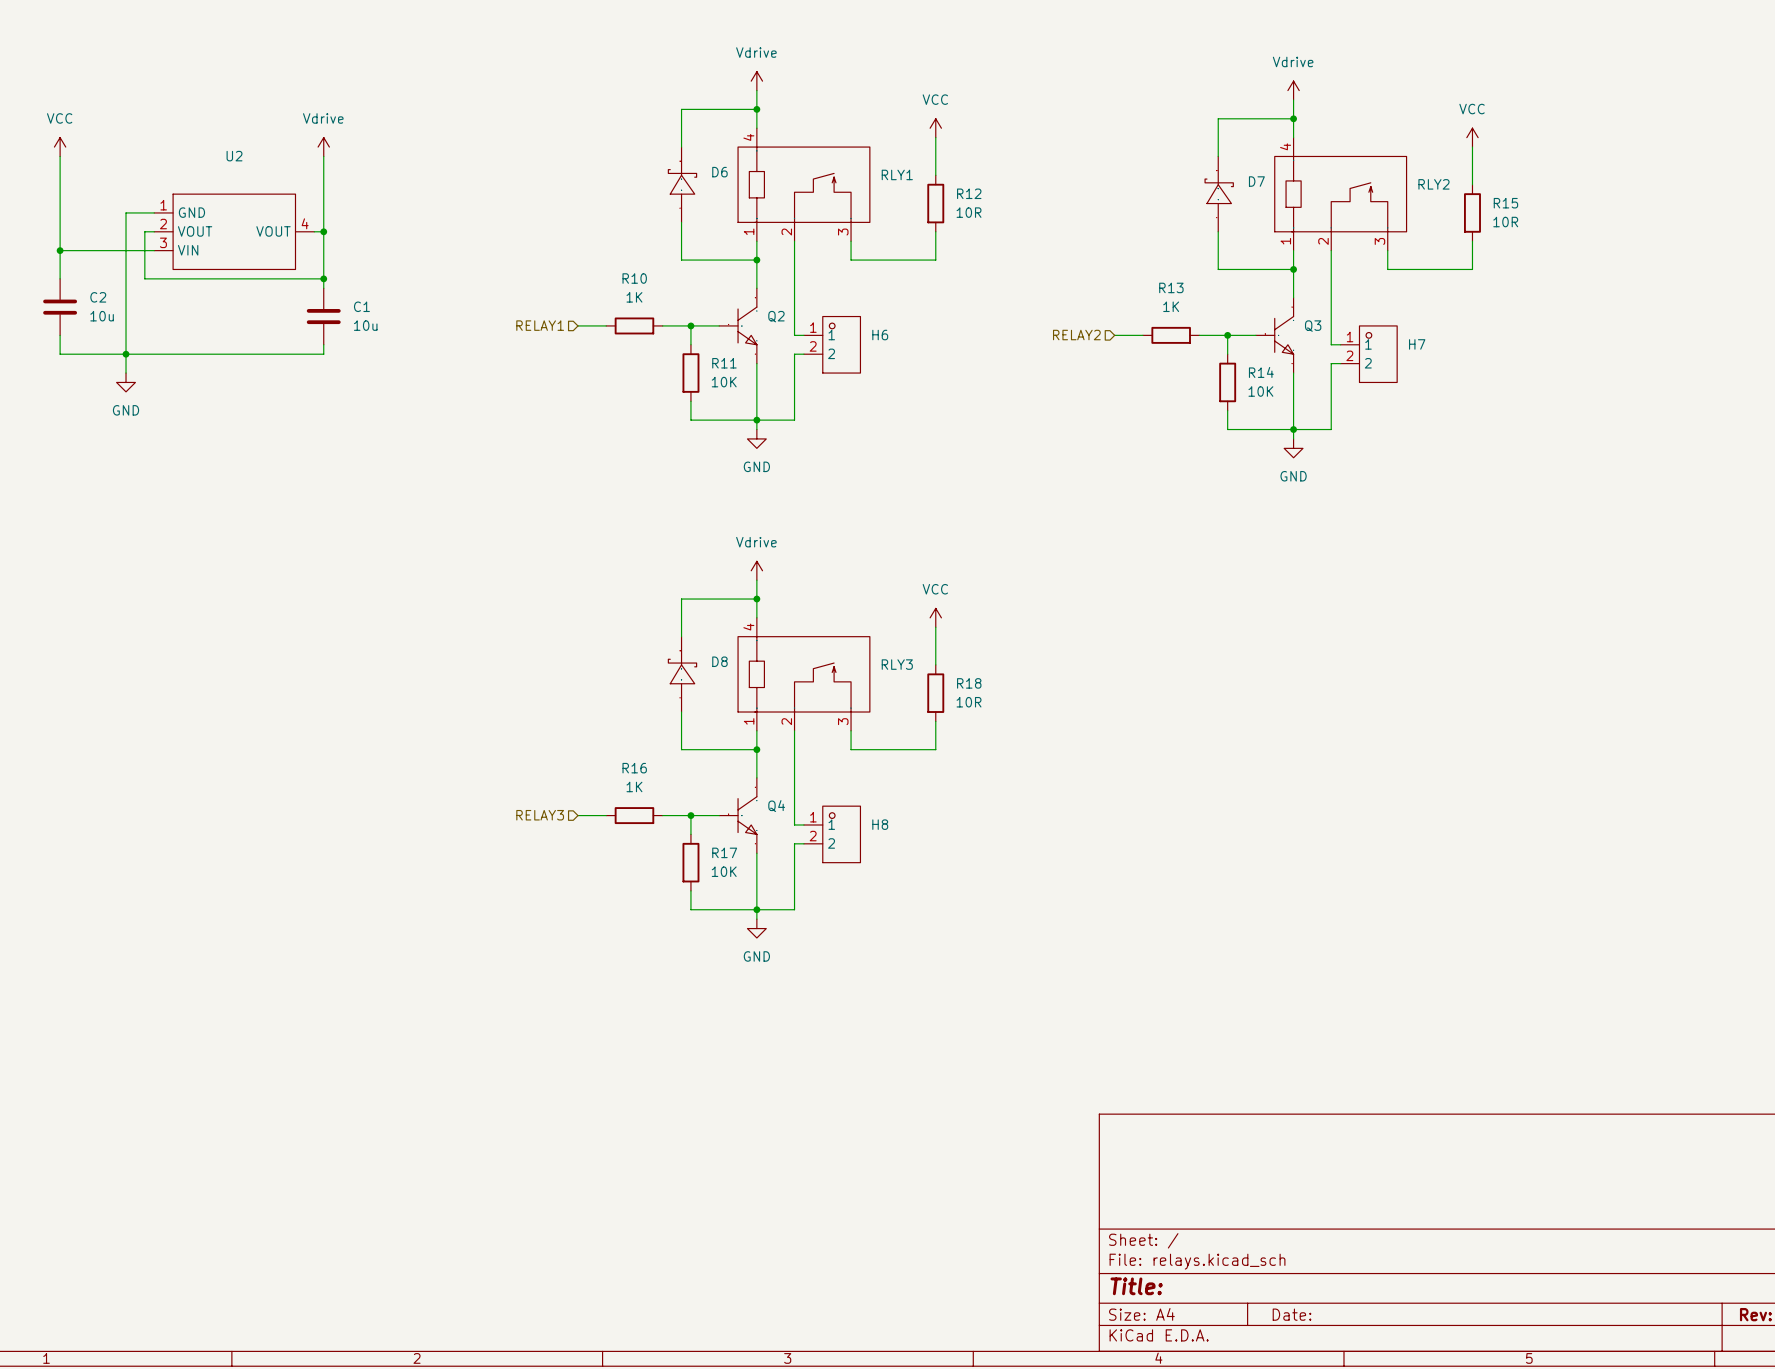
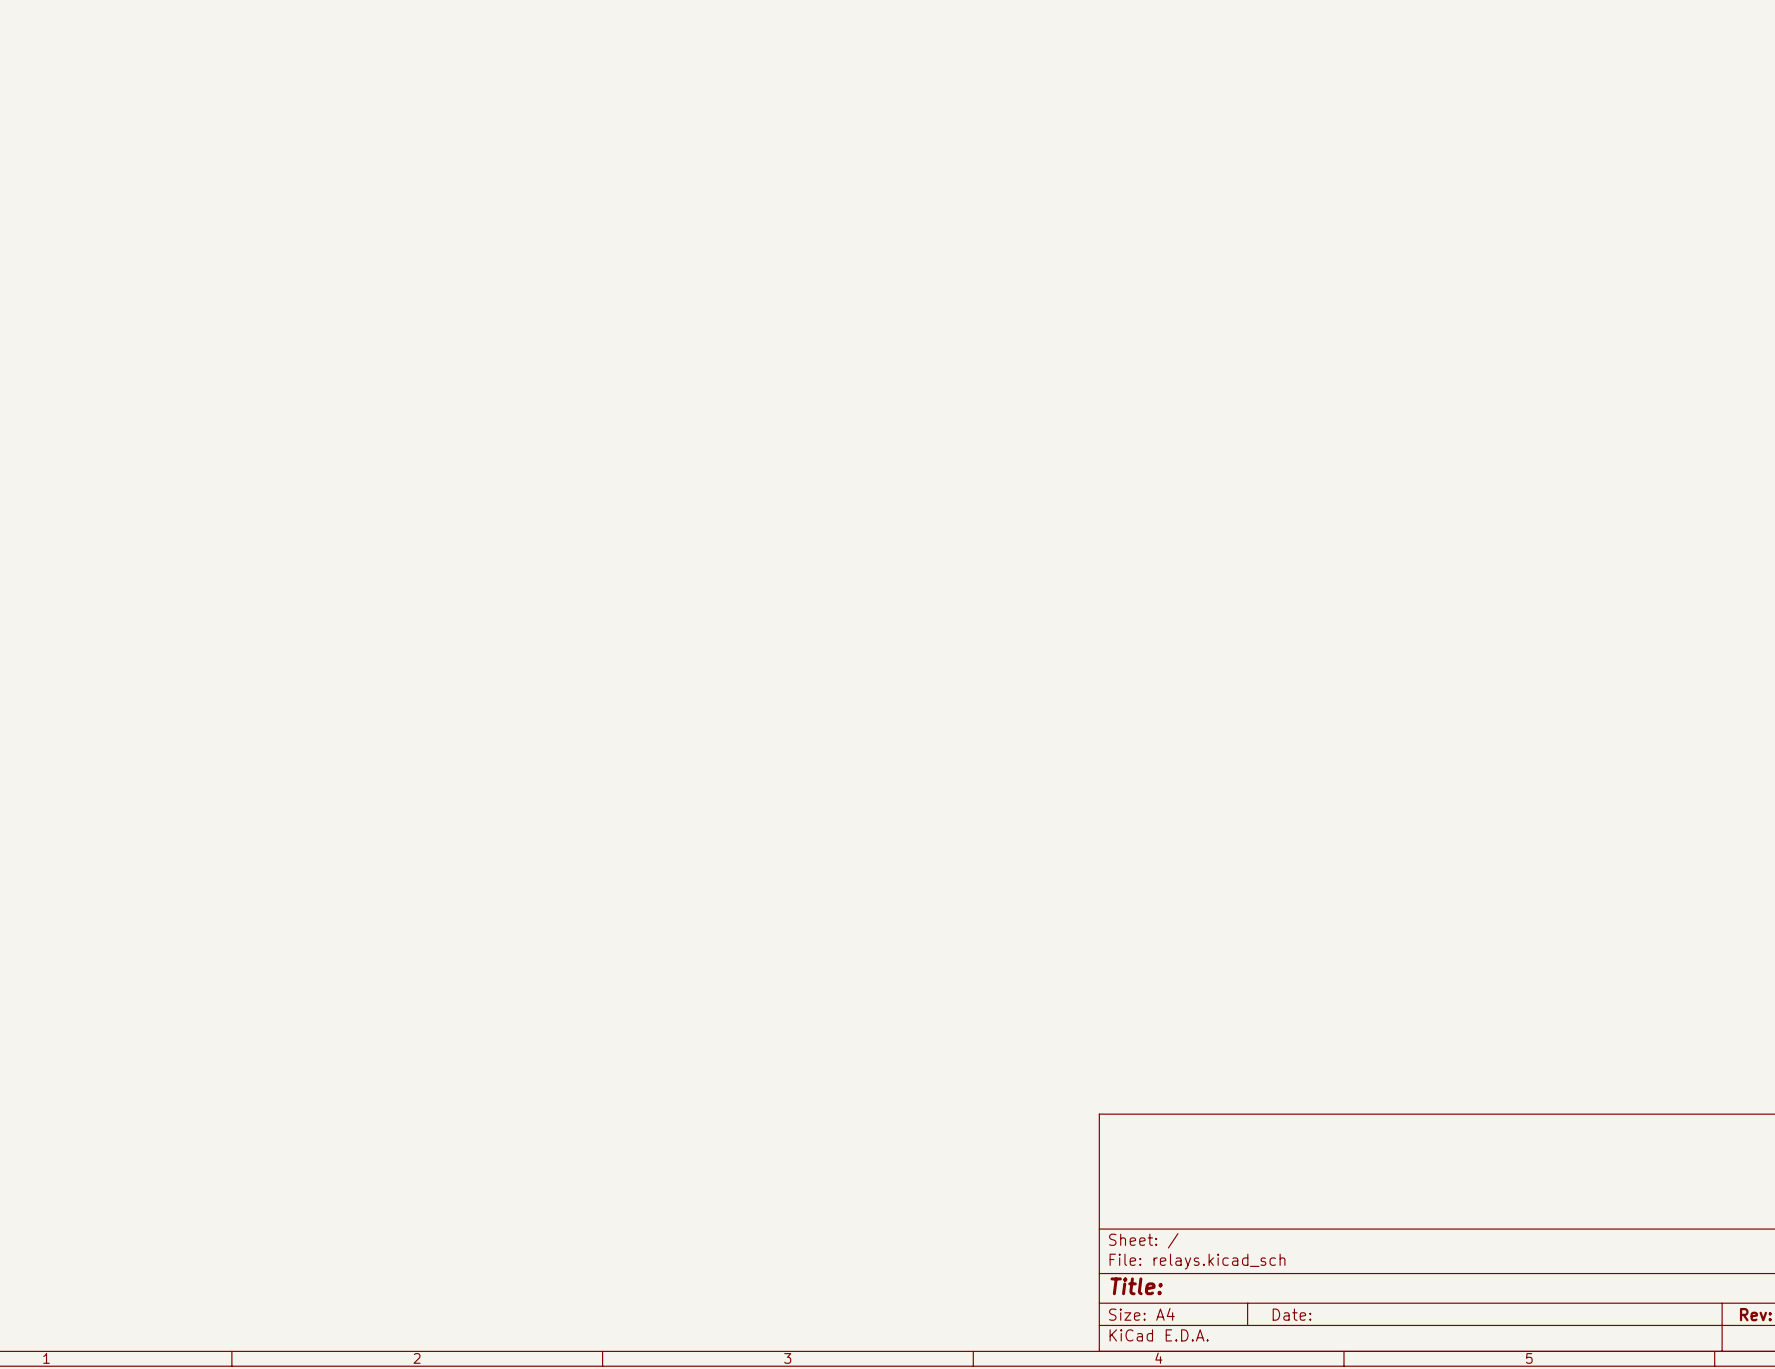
power symbol: Vdrive (756, 81) -> none
wire: (756, 90) (756, 128) -> none
power symbol: Vdrive (1293, 90) -> none
wire: (1293, 99) (1293, 137) -> none
wire: (756, 109) (681, 109) (681, 147) -> none
junction: (756, 109) -> none
wire: (1293, 118) (1218, 118) (1218, 156) -> none
junction: (1293, 118) -> none
power symbol: VCC (935, 128) -> none
wire: (935, 137) (935, 175) -> none
power symbol: VCC (1472, 137) -> none
power symbol: VCC (60, 147) -> none
power symbol: Vdrive (323, 147) -> none
wire: (1472, 147) (1472, 184) -> none
wire: (60, 156) (60, 278) -> none
wire: (323, 156) (323, 288) -> none
D6: (682, 184) -> none
RLY1: (803, 184) -> none
D7: (1219, 194) -> none
RLY2: (1340, 194) -> none
R12: 10R (935, 203) -> none
wire: (154, 212) (126, 212) (126, 373) -> none
R15: 10R (1472, 212) -> none
wire: (681, 222) (681, 260) (756, 260) -> none
wire: (154, 231) (144, 231) (144, 278) (323, 278) -> none
U2: (234, 231) -> none
wire: (314, 231) (323, 231) -> none
junction: (323, 231) -> none
wire: (935, 231) (935, 260) (851, 260) (851, 241) -> none
wire: (1218, 231) (1218, 269) (1293, 269) -> none
wire: (756, 241) (756, 288) -> none
wire: (794, 241) (794, 335) (803, 335) -> none
wire: (1472, 241) (1472, 269) (1387, 269) (1387, 250) -> none
wire: (60, 250) (154, 250) -> none
junction: (60, 250) -> none
wire: (1293, 250) (1293, 297) -> none
wire: (1331, 250) (1331, 344) (1340, 344) -> none
junction: (756, 260) -> none
junction: (1293, 269) -> none
junction: (323, 278) -> none
C2: 10u (60, 307) -> none
C1: 10u (323, 316) -> none
hierarchical label: RELAY1 (540, 325) -> none
wire: (577, 325) (606, 325) -> none
R10: 1K (634, 325) -> none
wire: (662, 325) (719, 325) -> none
wire: (690, 325) (690, 344) -> none
junction: (690, 325) -> none
Q2: (738, 325) -> none
wire: (60, 335) (60, 354) (323, 354) (323, 344) -> none
hierarchical label: RELAY2 (1076, 335) -> none
wire: (1114, 335) (1142, 335) -> none
R13: 1K (1171, 335) -> none
wire: (1199, 335) (1255, 335) -> none
wire: (1227, 335) (1227, 354) -> none
junction: (1227, 335) -> none
Q3: (1274, 335) -> none
H6: (832, 344) -> none
junction: (126, 354) -> none
wire: (803, 354) (794, 354) (794, 420) (690, 420) (690, 401) -> none
H7: (1368, 354) -> none
wire: (756, 363) (756, 429) -> none
wire: (1340, 363) (1331, 363) (1331, 429) (1227, 429) (1227, 410) -> none
R11: 10K (690, 373) -> none
wire: (1293, 373) (1293, 438) -> none
power symbol: GND (126, 382) -> none
R14: 10K (1227, 382) -> none
junction: (756, 420) -> none
junction: (1293, 429) -> none
power symbol: GND (756, 438) -> none
power symbol: GND (1293, 448) -> none
power symbol: Vdrive (756, 570) -> none
wire: (756, 580) (756, 617) -> none
wire: (756, 599) (681, 599) (681, 636) -> none
junction: (756, 599) -> none
power symbol: VCC (935, 617) -> none
wire: (935, 627) (935, 664) -> none
D8: (682, 674) -> none
RLY3: (803, 674) -> none
R18: 10R (935, 693) -> none
wire: (681, 712) (681, 749) (756, 749) -> none
wire: (935, 721) (935, 749) (851, 749) (851, 730) -> none
wire: (756, 730) (756, 777) -> none
wire: (794, 730) (794, 824) (803, 824) -> none
junction: (756, 749) -> none
hierarchical label: RELAY3 (540, 815) -> none
wire: (577, 815) (606, 815) -> none
R16: 1K (634, 815) -> none
wire: (662, 815) (719, 815) -> none
wire: (690, 815) (690, 834) -> none
junction: (690, 815) -> none
Q4: (738, 815) -> none
H8: (832, 834) -> none
wire: (803, 843) (794, 843) (794, 909) (690, 909) (690, 890) -> none
wire: (756, 853) (756, 919) -> none
R17: 10K (690, 862) -> none
junction: (756, 909) -> none
power symbol: GND (756, 928) -> none

